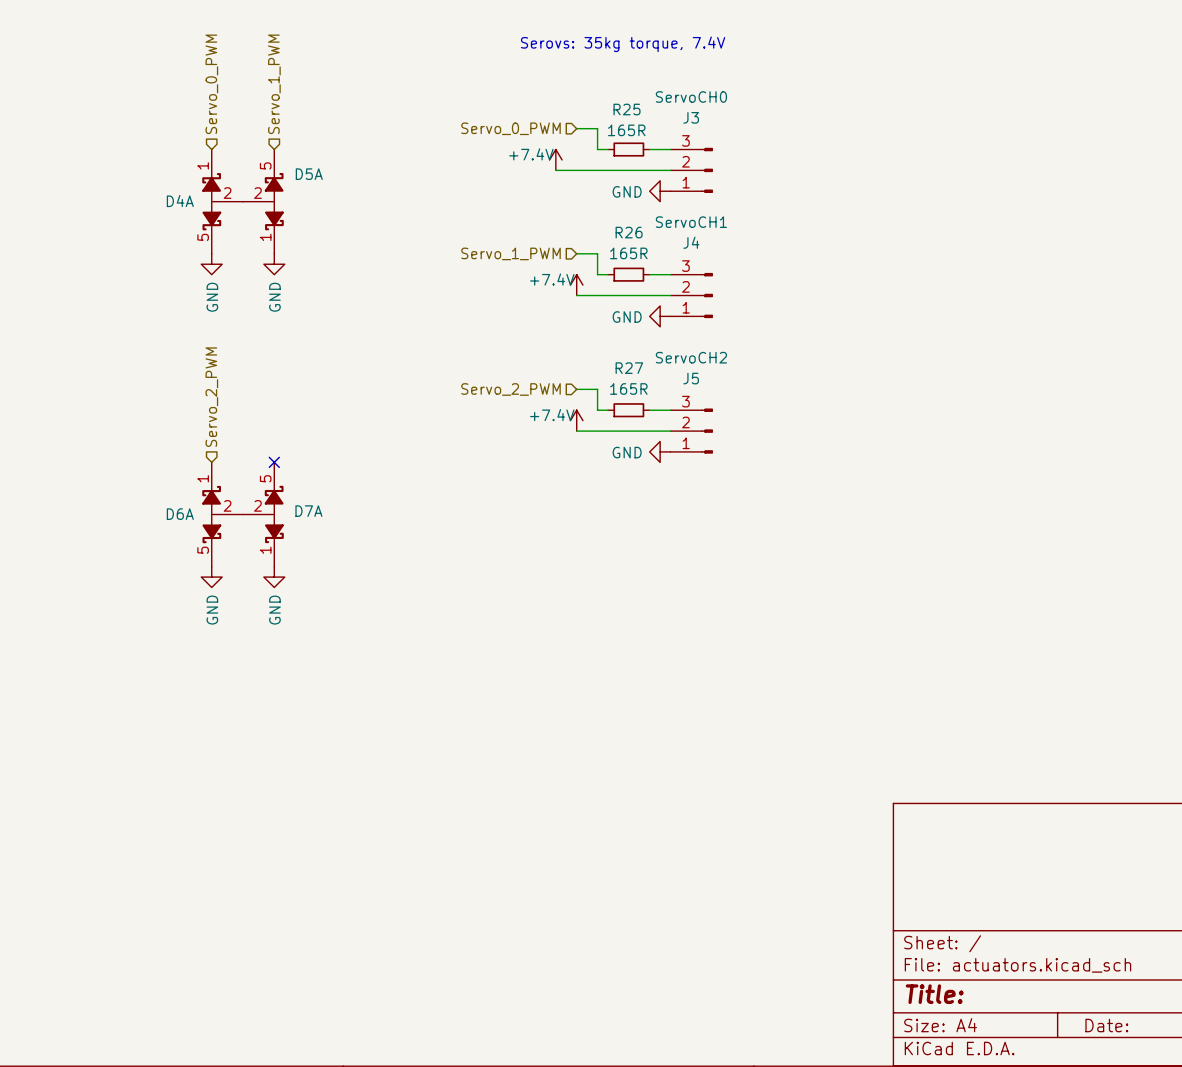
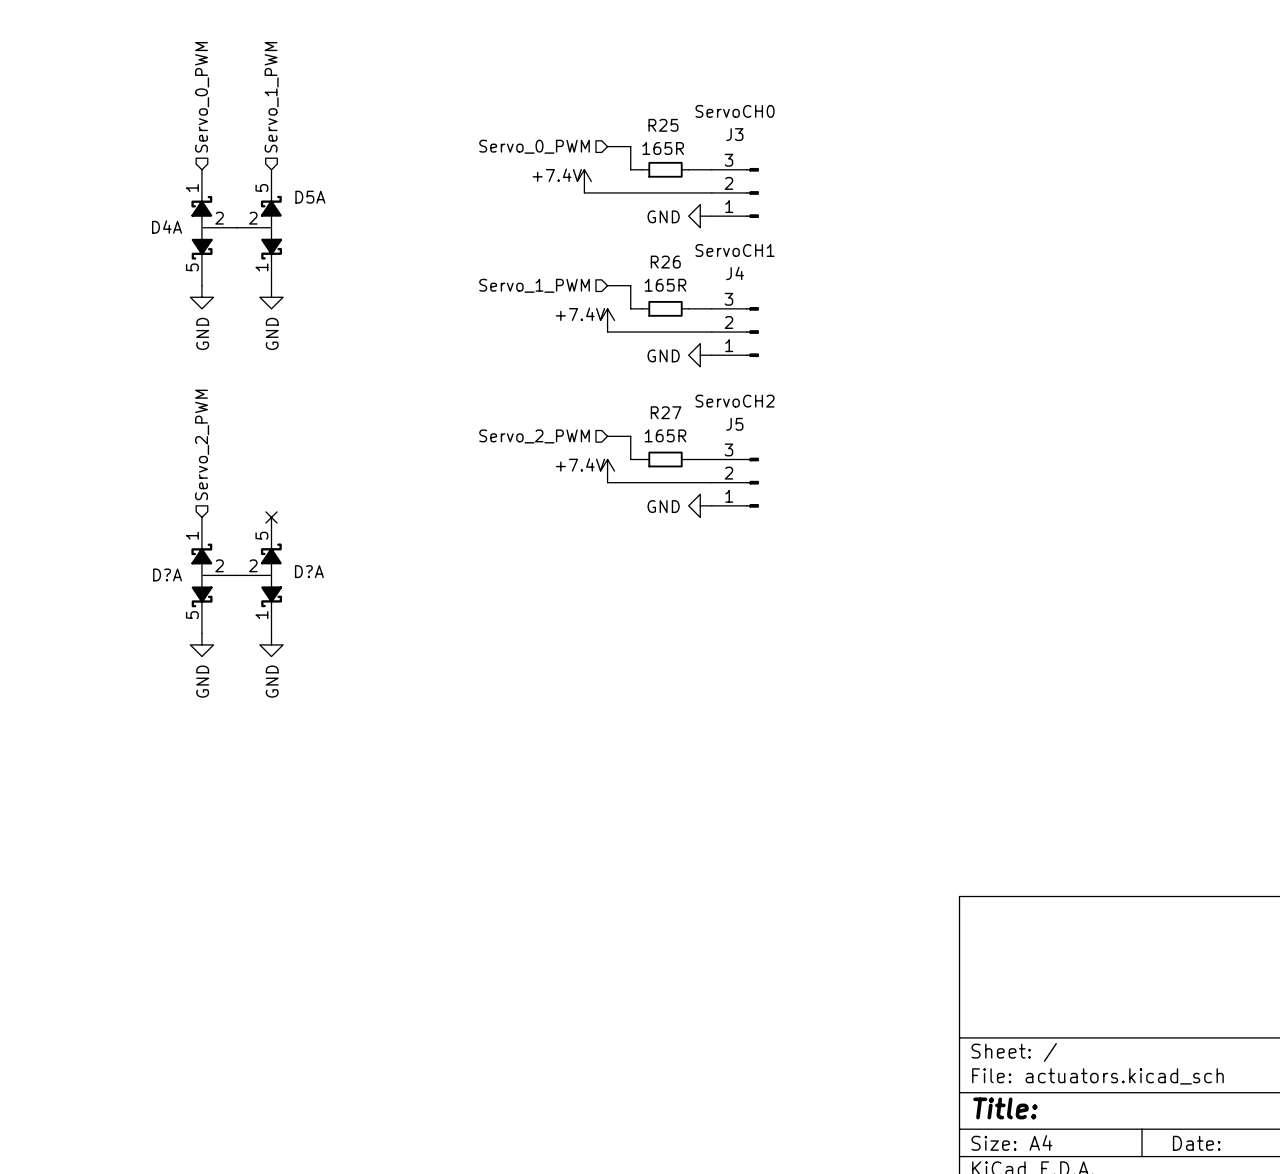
text: Serovs: 35kg torque, 7.4V (623, 44) -> none
D7A name: D7A (308, 511) -> D?A (309, 571)
D6A name: D6A (180, 514) -> D?A (167, 574)

